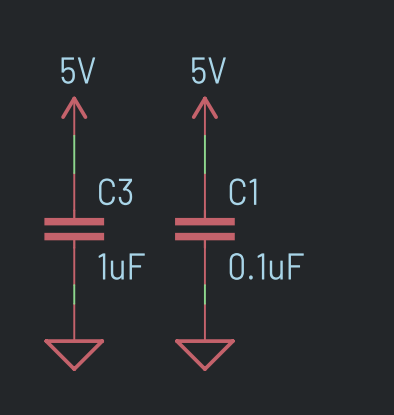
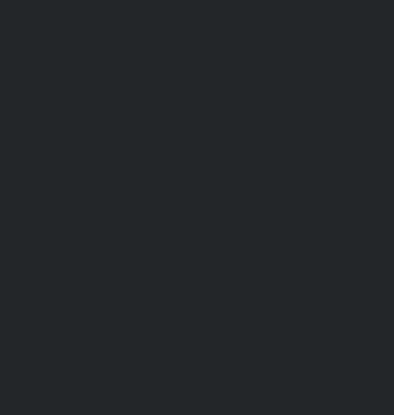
power symbol: 5V (74, 116) -> none
power symbol: 5V (204, 116) -> none
wire: (74, 135) (74, 173) -> none
wire: (204, 135) (204, 173) -> none
C3: 1uF (74, 229) -> none
C1: 0.1uF (204, 229) -> none
wire: (74, 285) (74, 303) -> none
wire: (204, 285) (204, 303) -> none
power symbol: (74, 337) -> none
power symbol: (204, 337) -> none

